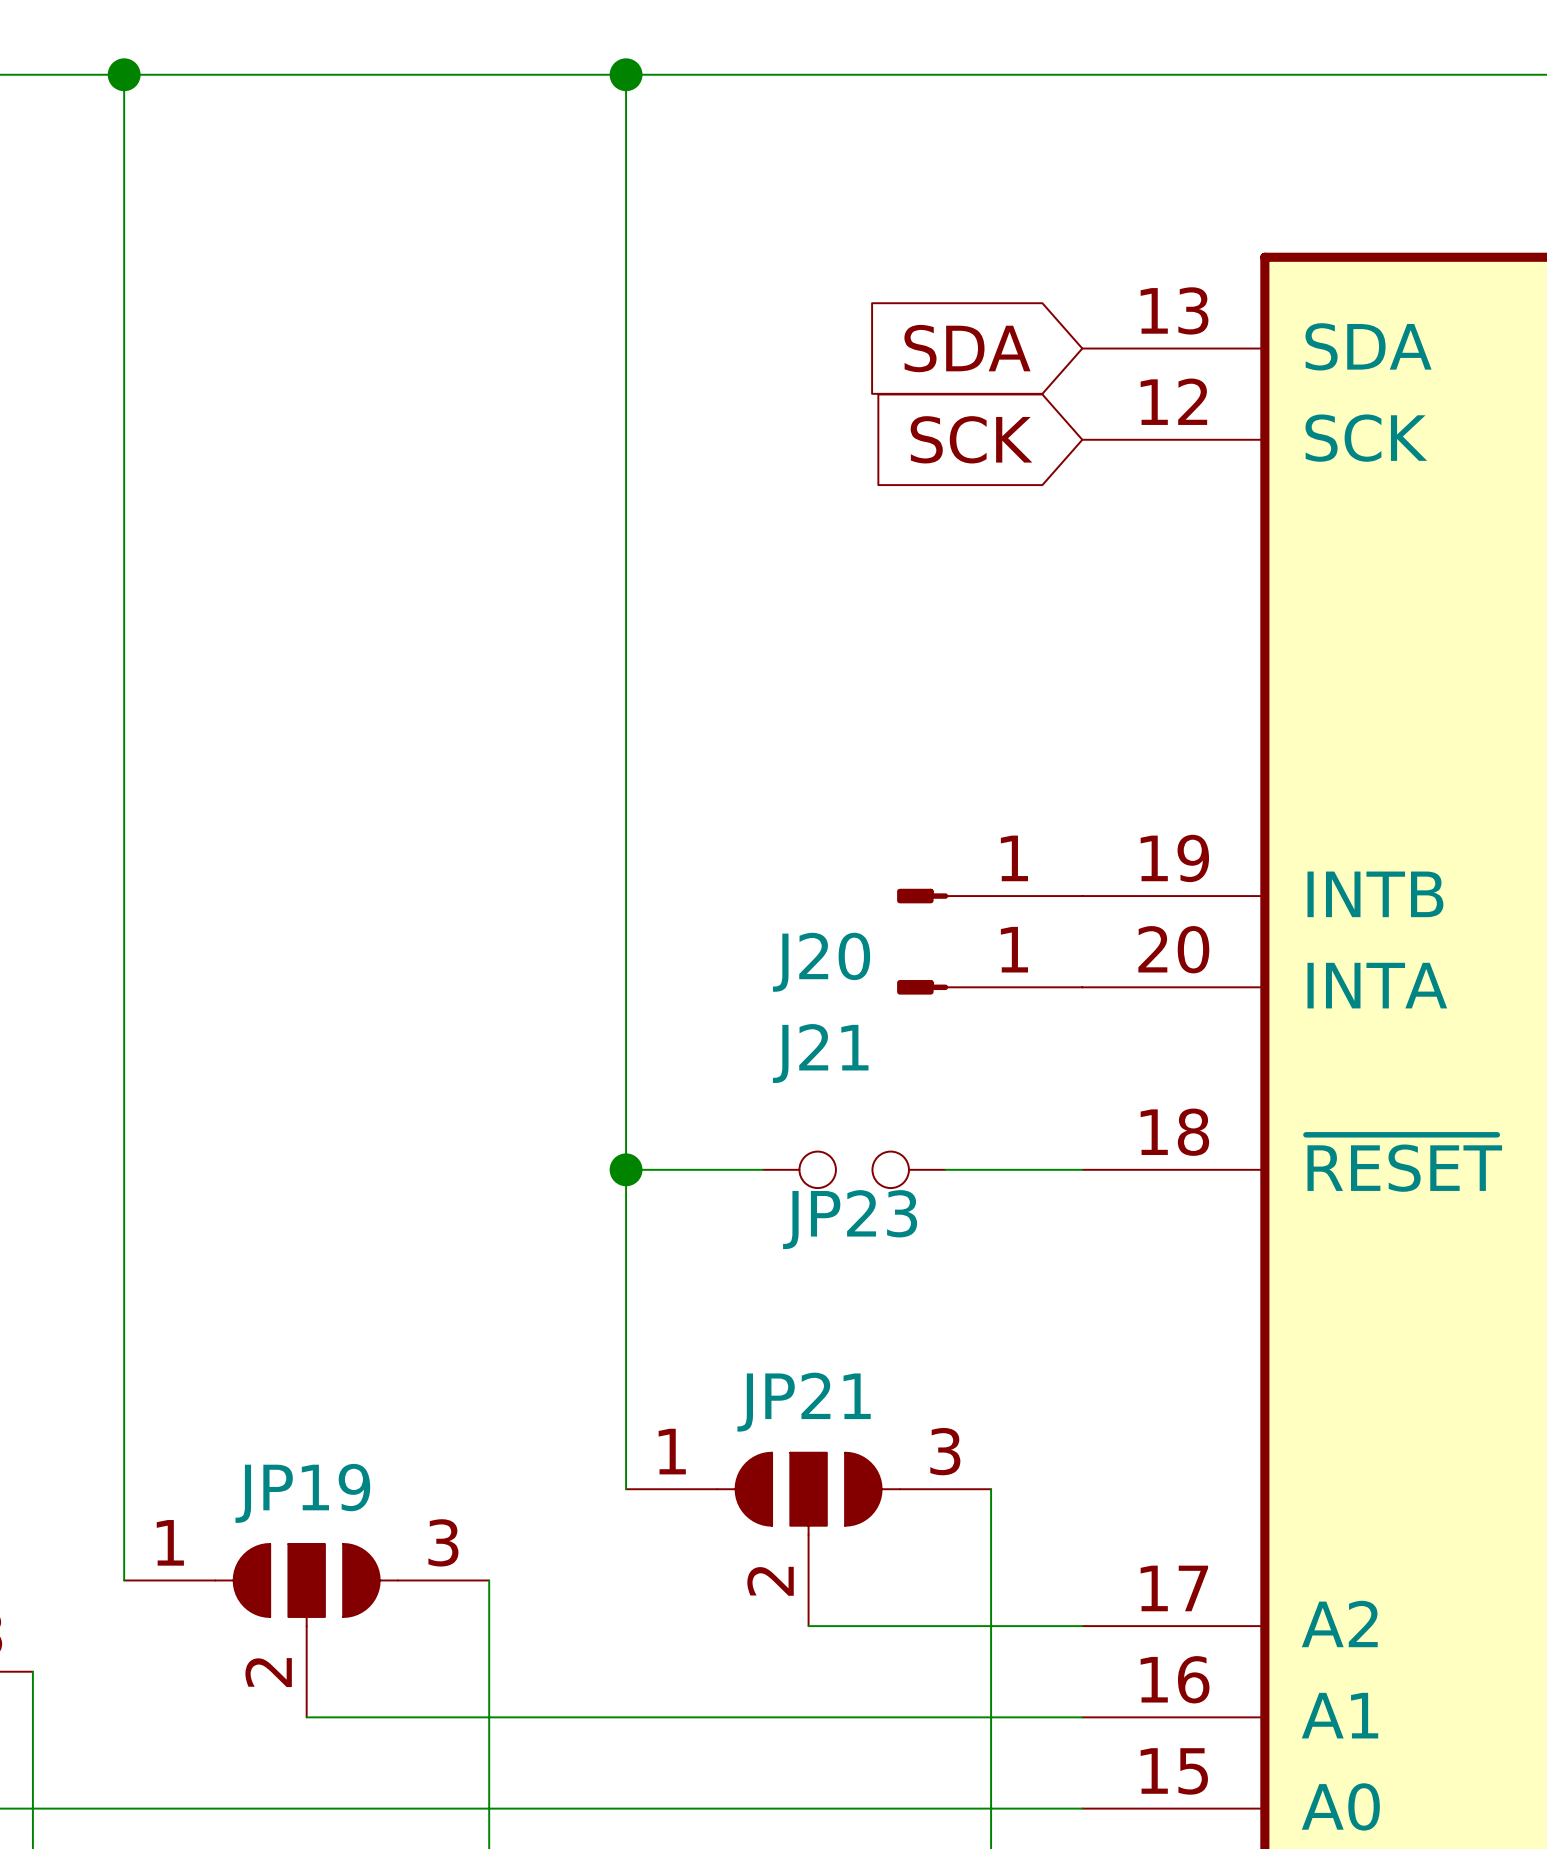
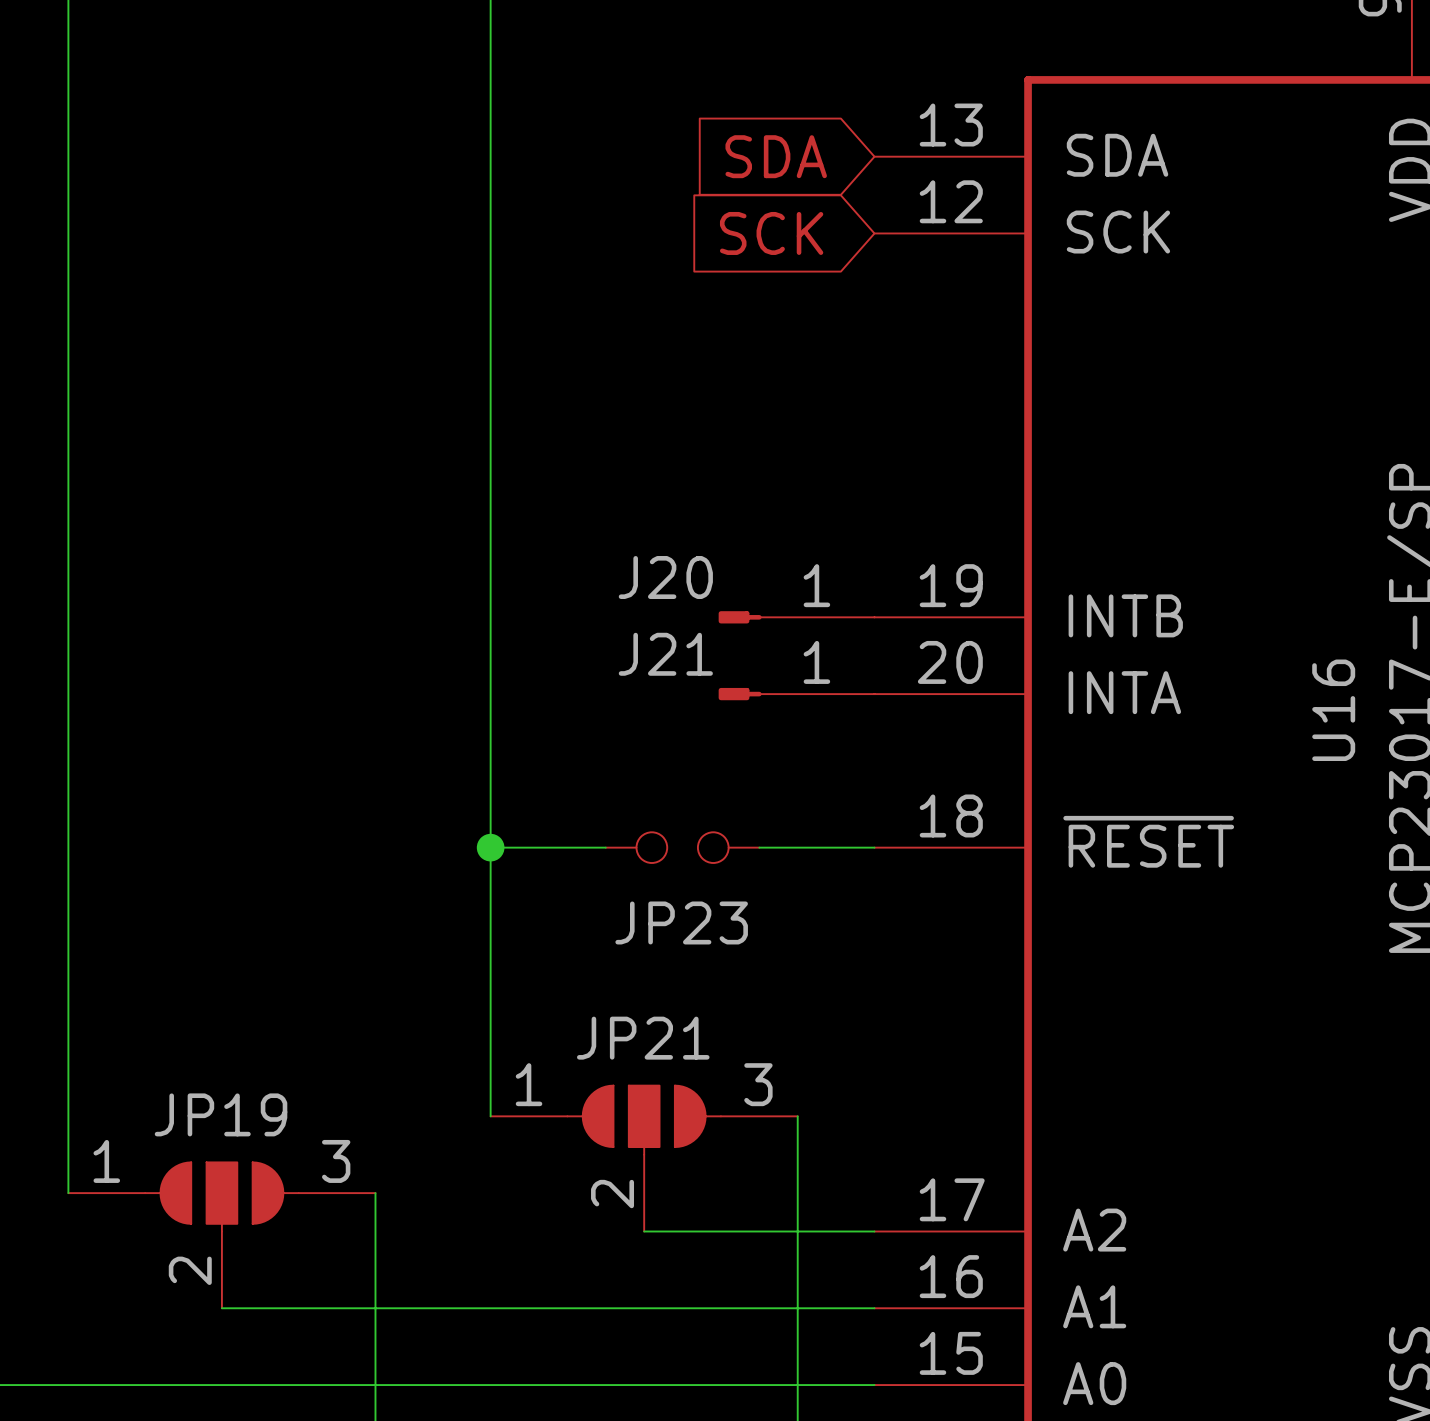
J20 name position: J20 (821, 962) -> J20 (665, 577)
J21 name position: J21 (820, 1053) -> J21 (665, 654)
JP23 name position: JP23 (850, 1219) -> JP23 (681, 922)

